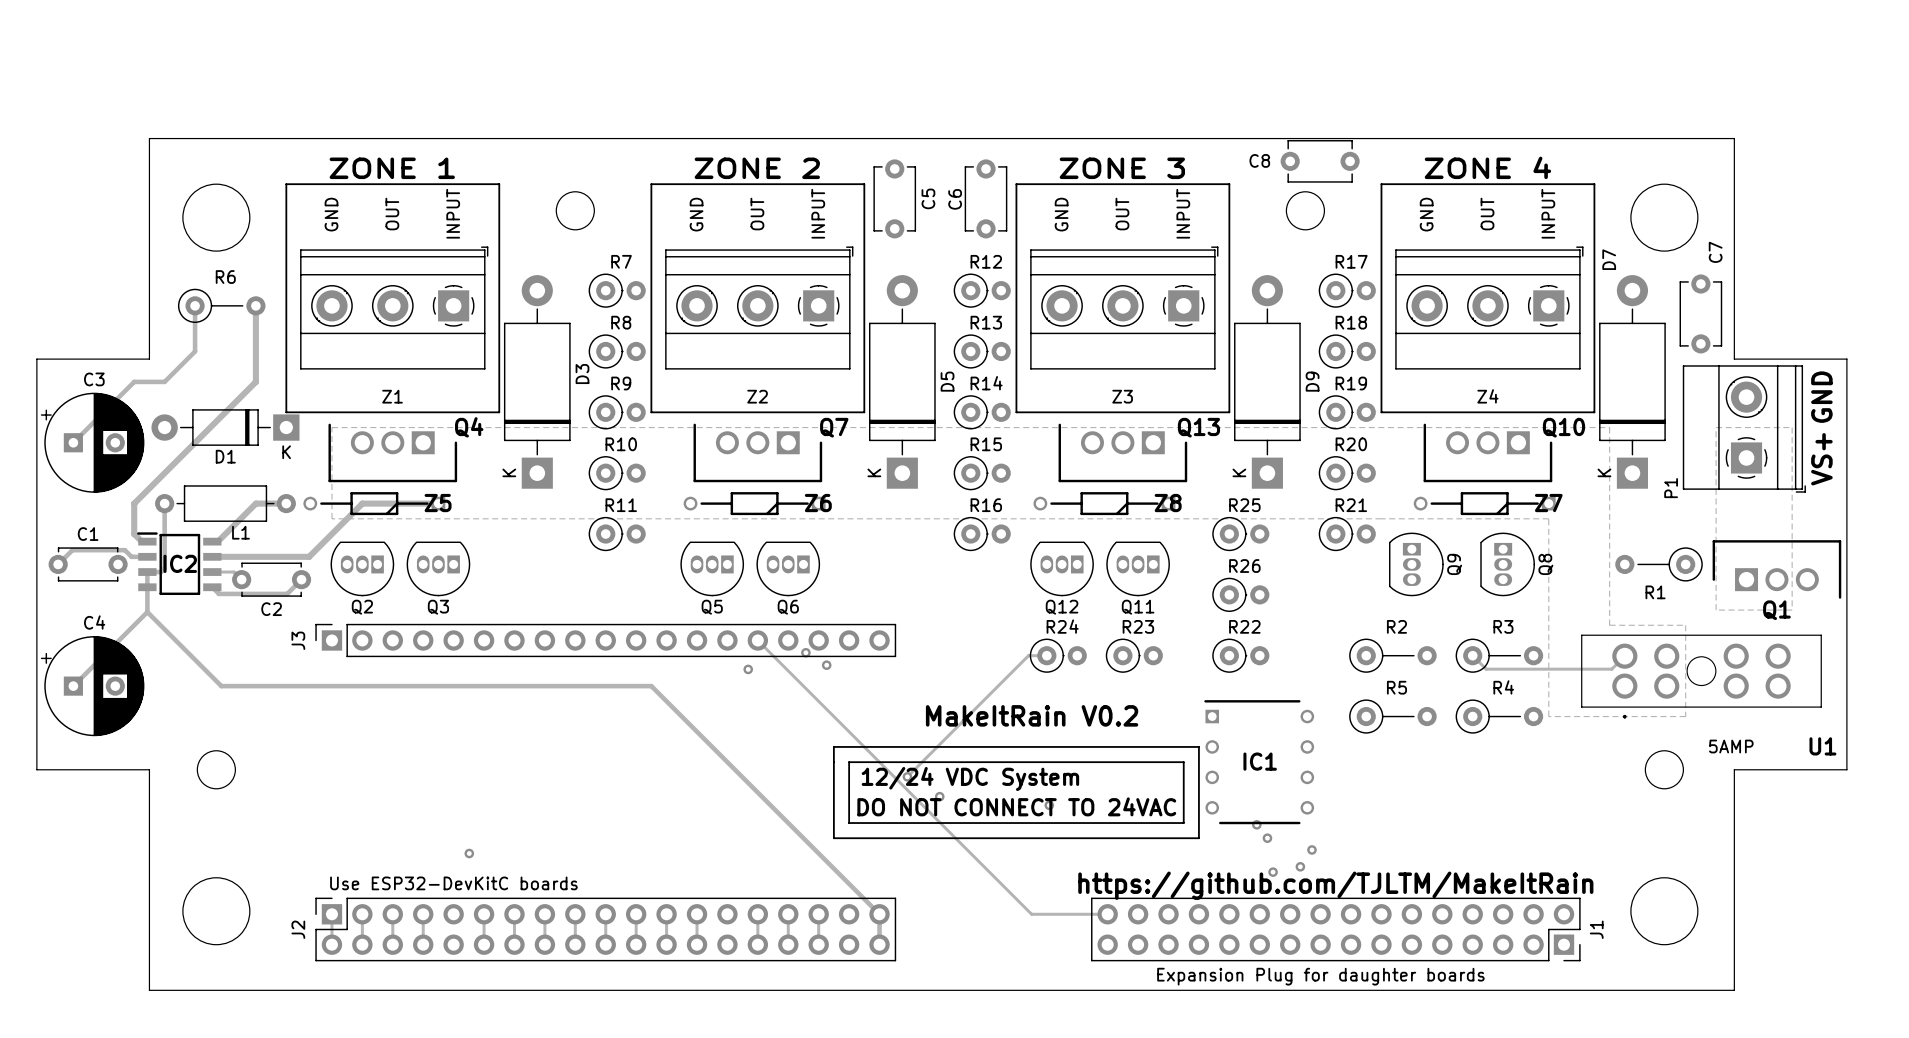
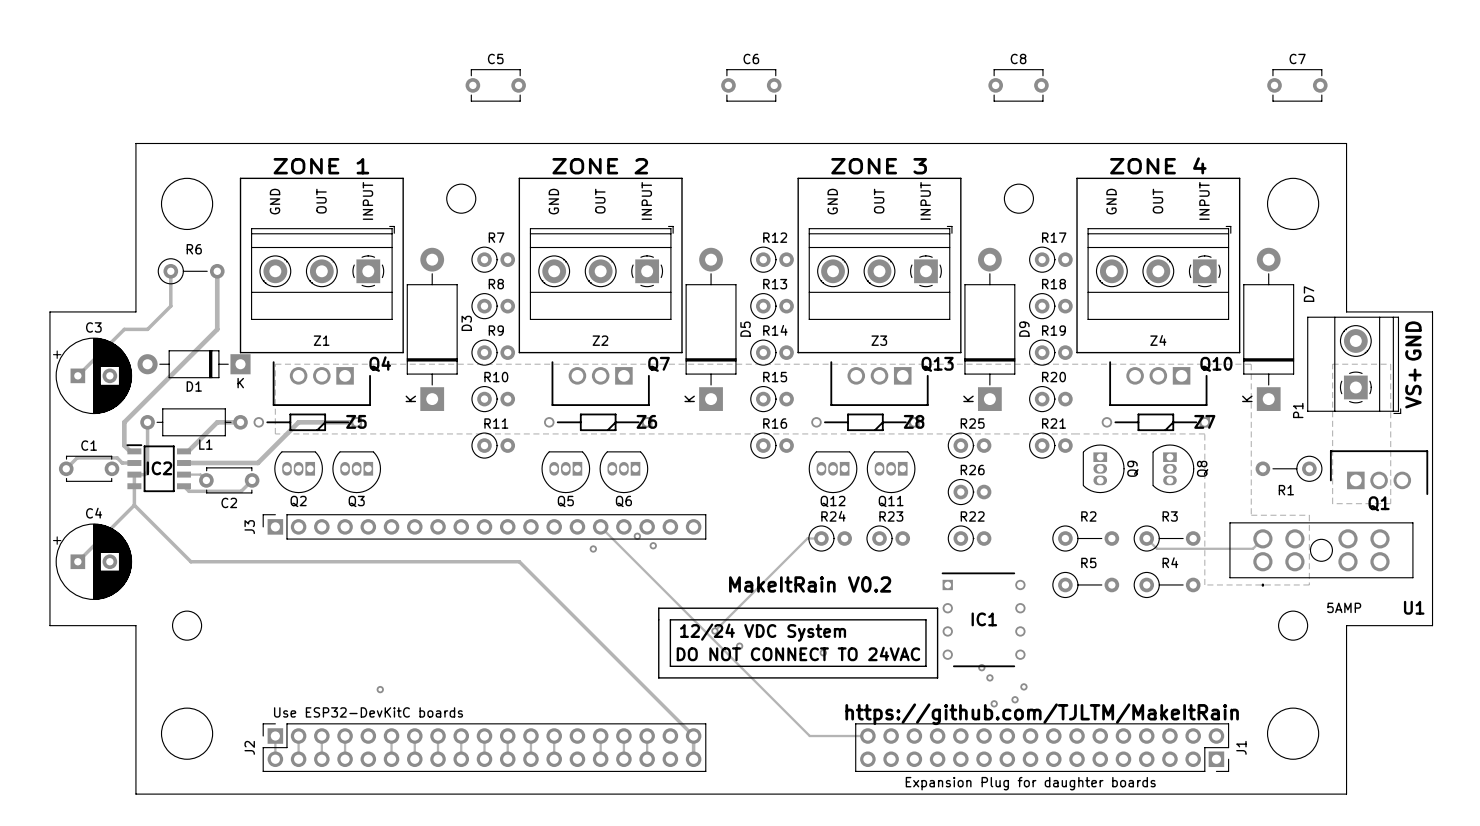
C8 name position: C8 (1259, 160) -> C8 (1018, 58)
C8 position: (1320, 161) -> (1018, 85)
C5 rotation: 0° (894, 198) -> 90° clockwise (495, 85)
C5 position: (894, 198) -> (495, 85)
C5 name position: C5 (928, 198) -> C5 (495, 58)
C6 rotation: 0° (986, 198) -> 90° clockwise (751, 85)
C6 position: (986, 198) -> (751, 85)
C7 name position: C7 (1715, 252) -> C7 (1297, 58)
D7 name position: D7 (1609, 259) -> D7 (1309, 294)
C7 rotation: 0° (1700, 313) -> 90° clockwise (1297, 85)
C7 position: (1700, 313) -> (1297, 85)

